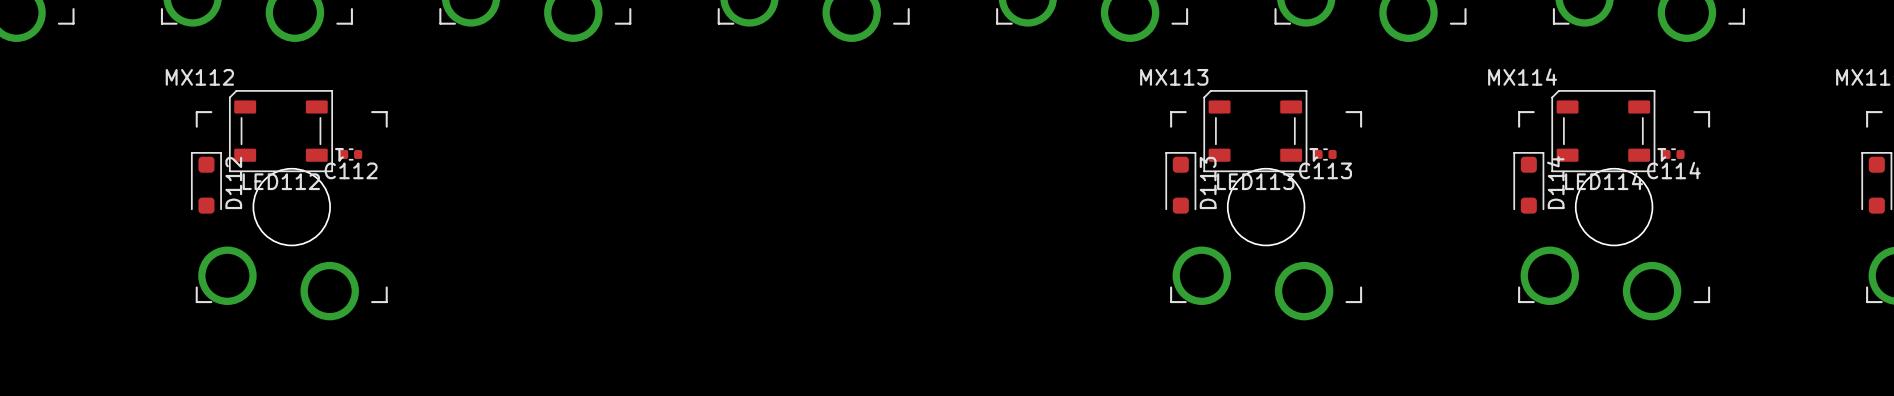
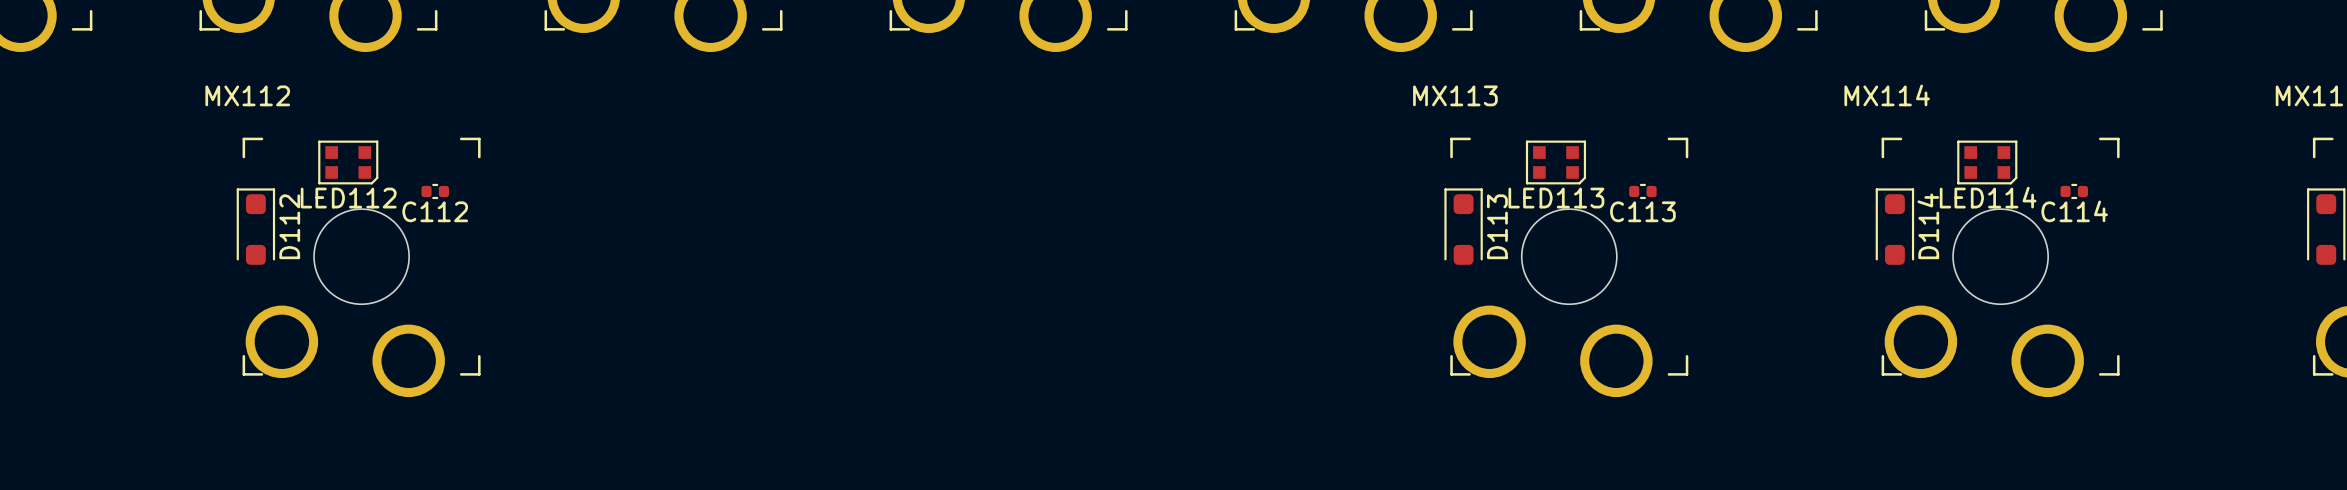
LED112 footprint: [228, 90, 334, 173] -> [318, 140, 379, 185]
LED113 footprint: [1203, 90, 1308, 173] -> [1525, 140, 1587, 185]
LED114 footprint: [1551, 90, 1656, 173] -> [1957, 140, 2018, 185]

